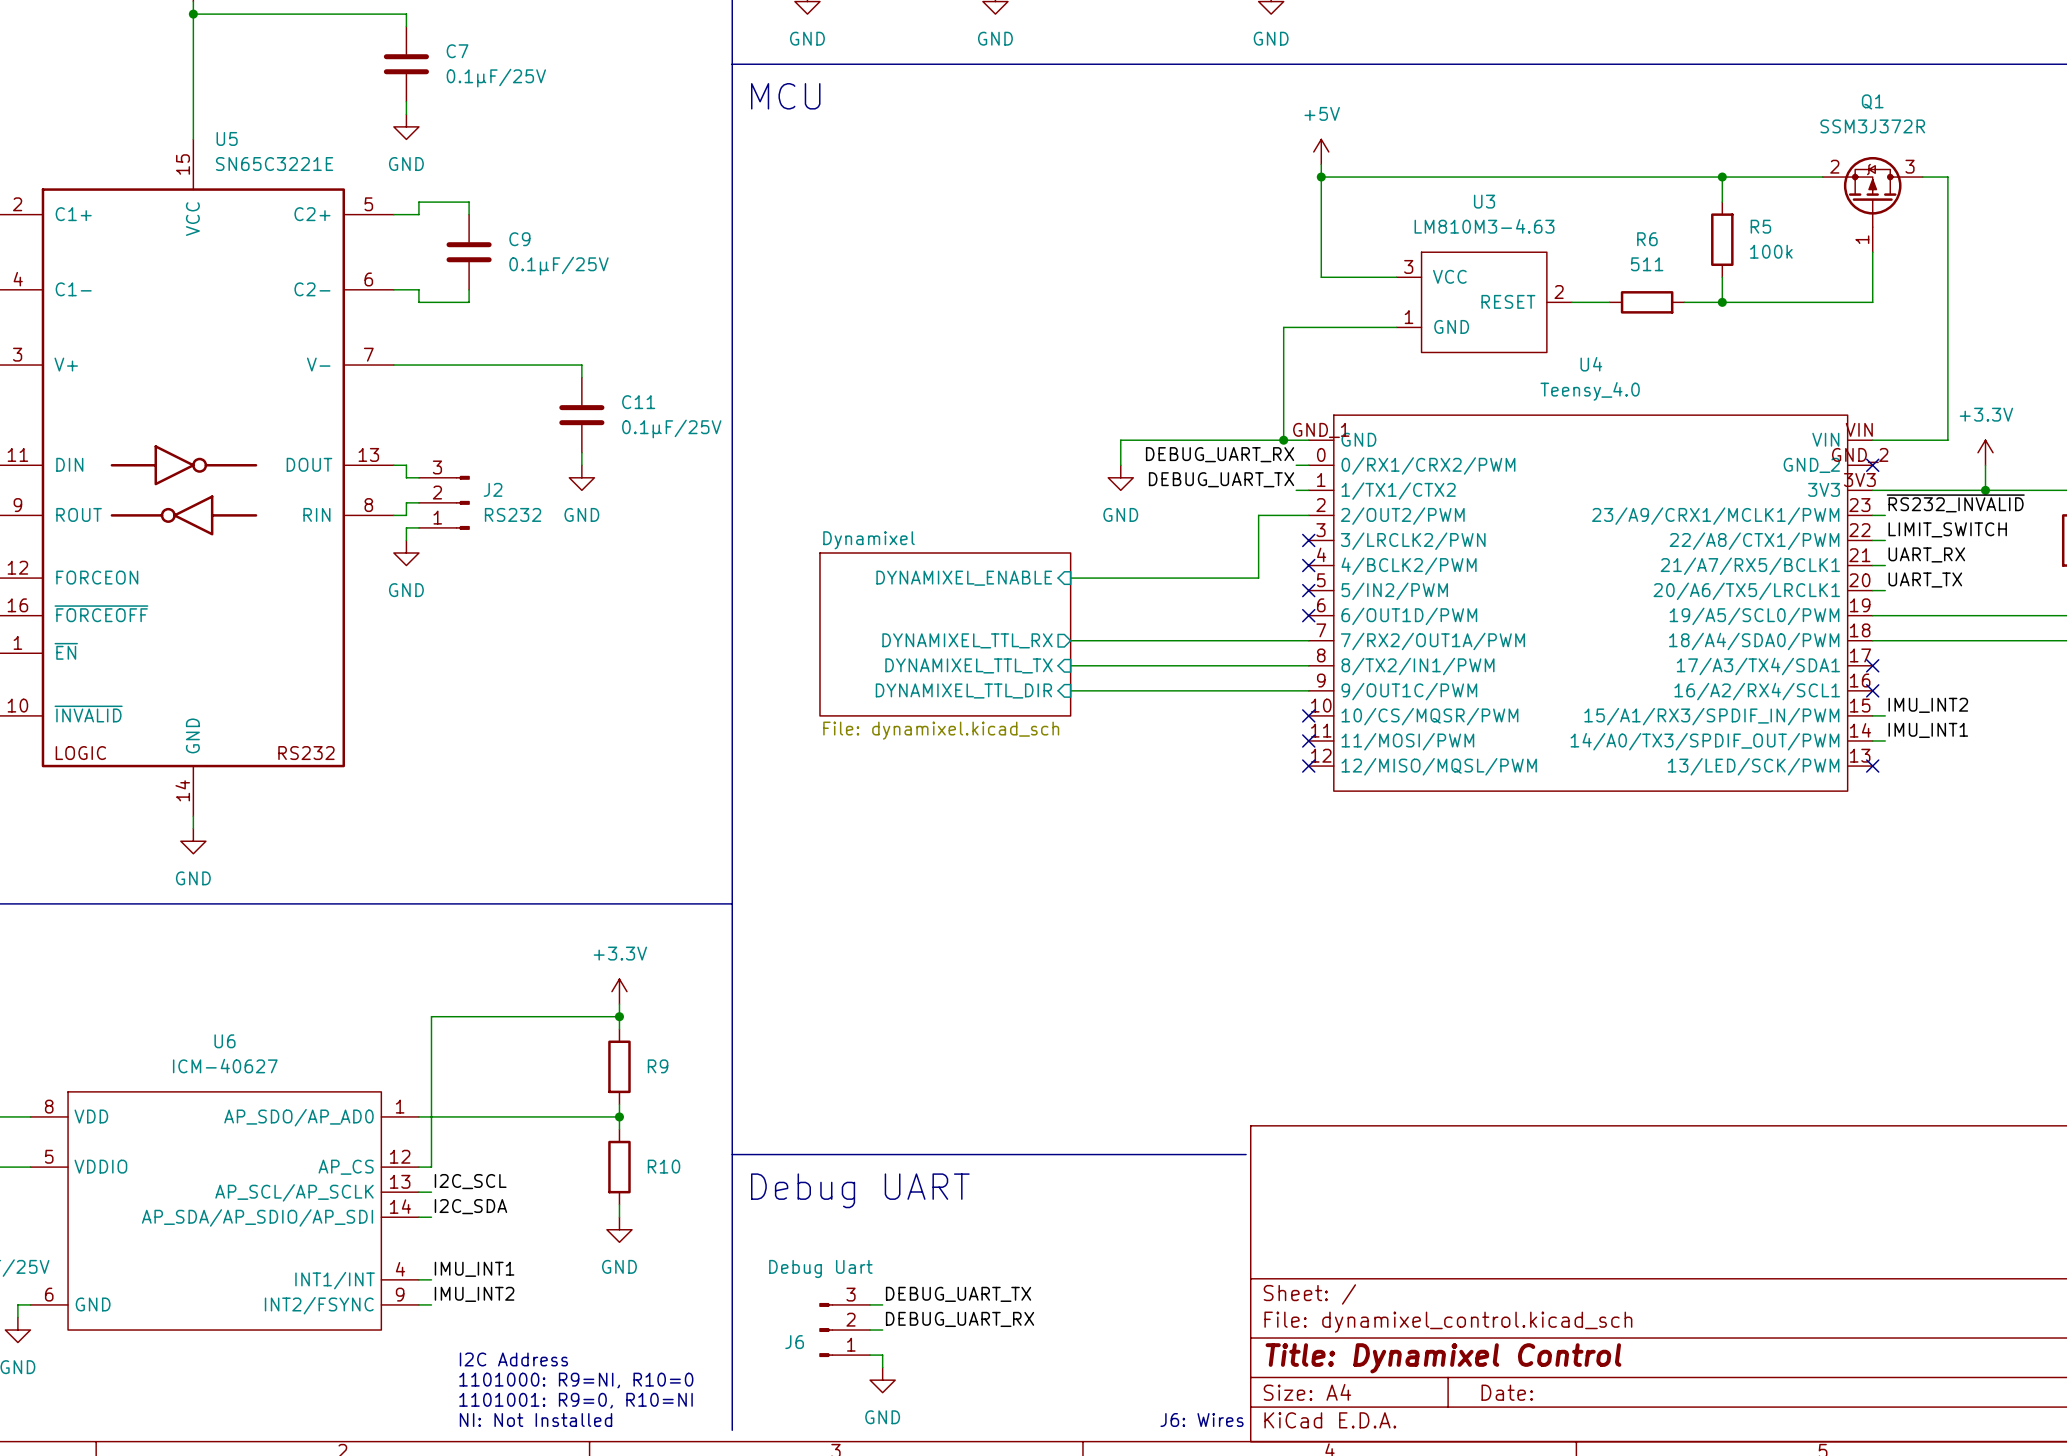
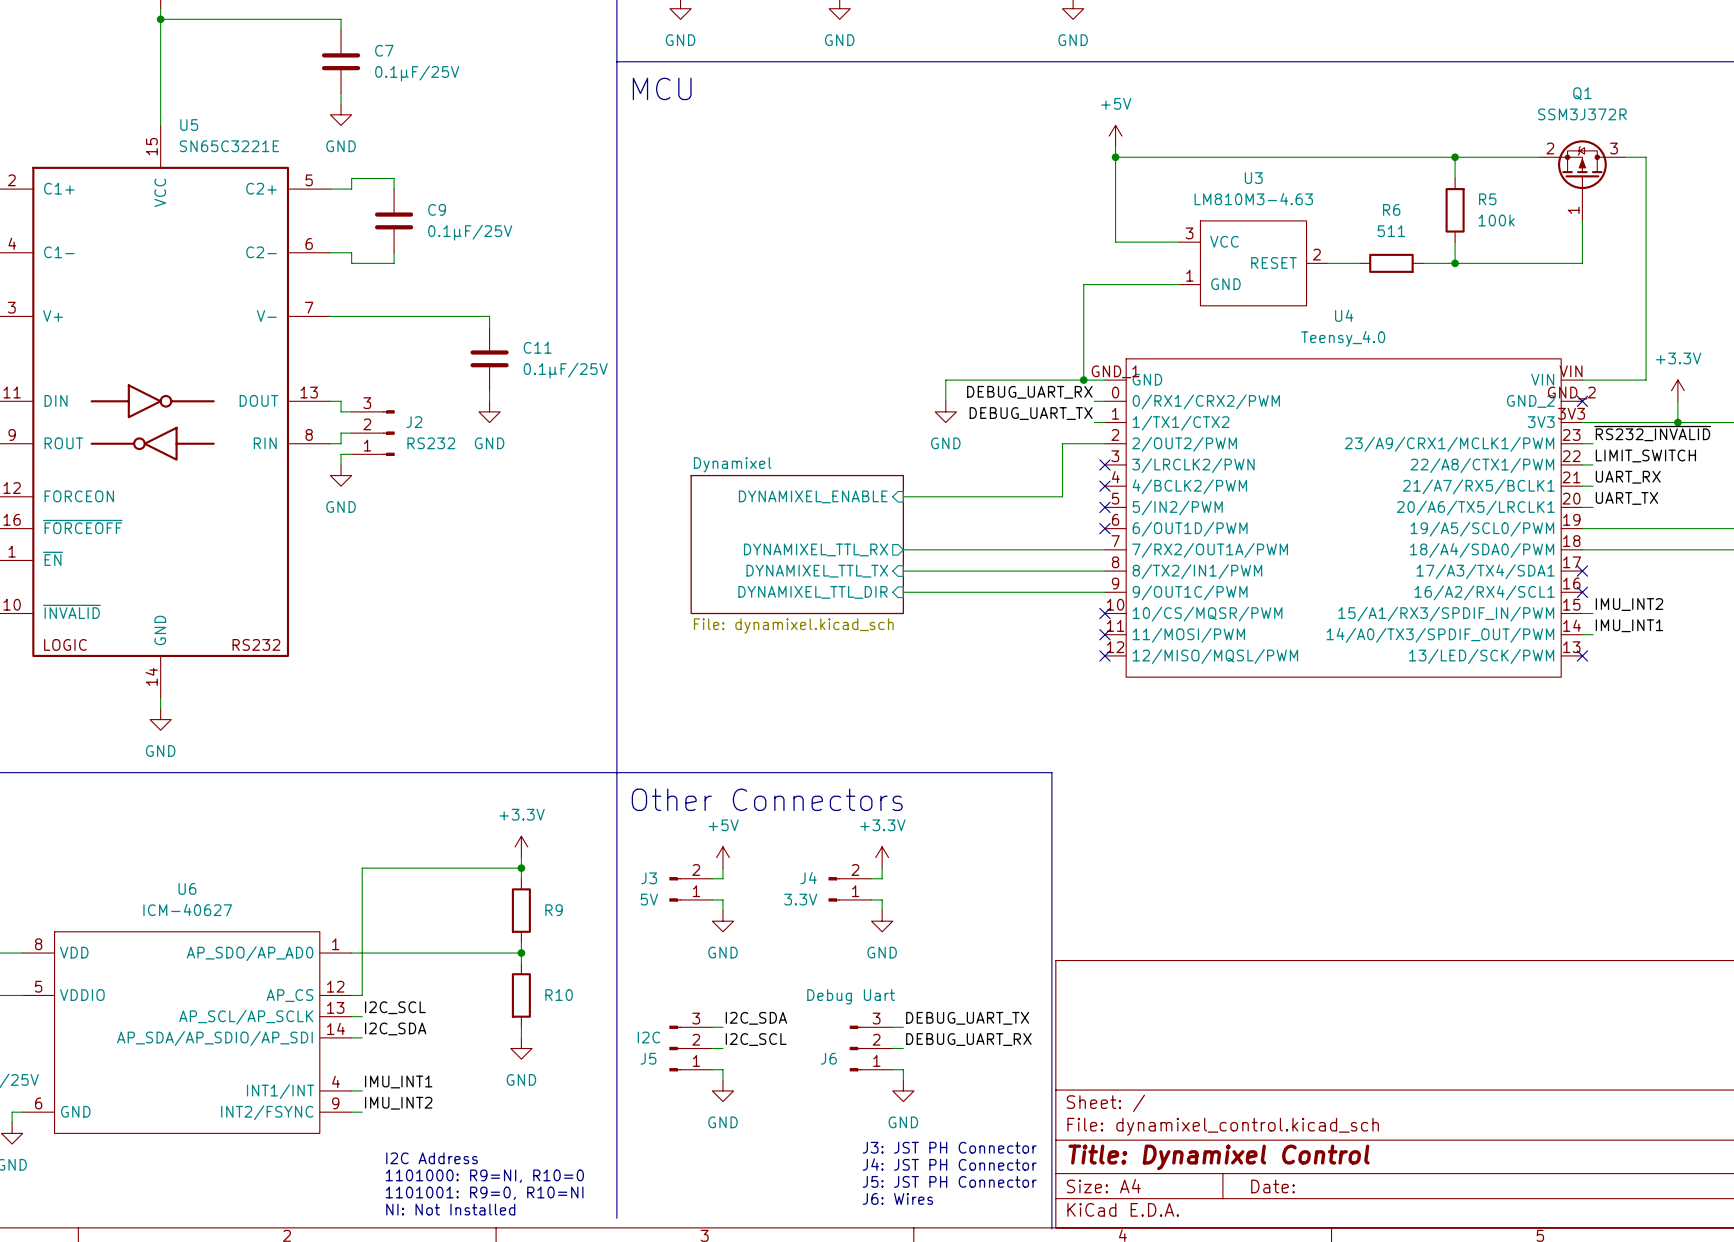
line: none -> (616, 772) (1051, 772) (1051, 1228)
text: none -> Other Connectors (767, 799)
power symbol: none -> +5V (722, 857)
power symbol: none -> +3.3V (882, 857)
wire: none -> (722, 868) (722, 878) (712, 878)
wire: none -> (882, 868) (882, 878) (871, 878)
J3: none -> 5V (690, 889)
J4: none -> 3.3V (849, 889)
wire: none -> (712, 899) (722, 899) (722, 910)
wire: none -> (871, 899) (882, 899) (882, 910)
power symbol: none -> GND (722, 921)
power symbol: none -> GND (882, 921)
line: (732, 1154) (1246, 1154) -> none
text: Debug UART (860, 1190) -> none
label: none -> I2C_SDA (756, 1018)
wire: none -> (892, 1027) (903, 1027)
label: none -> I2C_SCL (756, 1039)
J5: none -> I2C (690, 1048)
wire: none -> (892, 1048) (903, 1048)
wire: none -> (892, 1069) (903, 1069) (903, 1080)
power symbol: none -> GND (903, 1090)
label position: DEBUG_UART_TX (958, 1294) -> DEBUG_UART_TX (967, 1018)
wire: (870, 1304) (882, 1304) -> (712, 1027) (722, 1027)
label position: DEBUG_UART_RX (960, 1319) -> DEBUG_UART_RX (968, 1039)
J6 position: (844, 1330) -> (871, 1048)
wire: (870, 1330) (882, 1330) -> (712, 1048) (722, 1048)
text: none -> J3: JST PH Connector (949, 1147)
wire: (870, 1355) (882, 1355) (882, 1367) -> (712, 1069) (722, 1069) (722, 1080)
text: none -> J4: JST PH Connector (949, 1164)
power symbol position: GND (882, 1380) -> GND (722, 1090)
text: none -> J5: JST PH Connector (949, 1181)
text position: J6: Wires (1202, 1420) -> J6: Wires (897, 1198)

